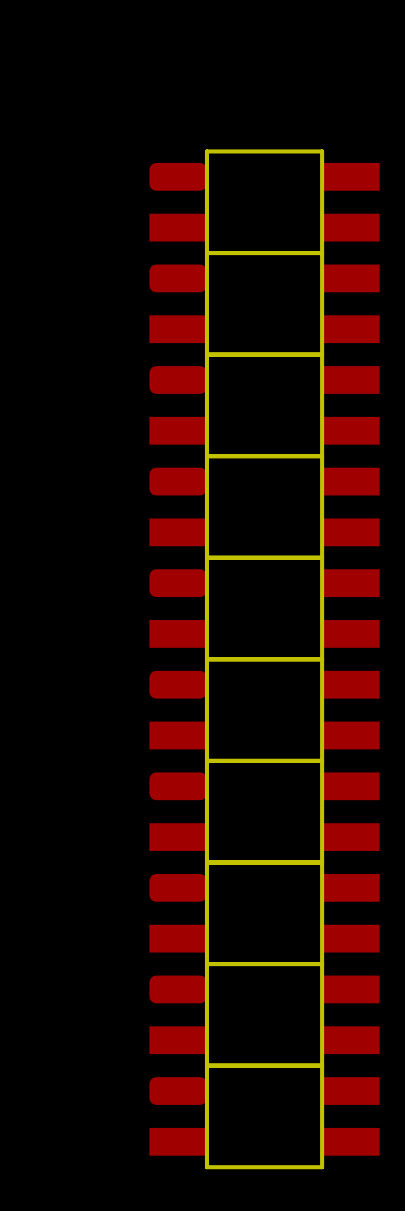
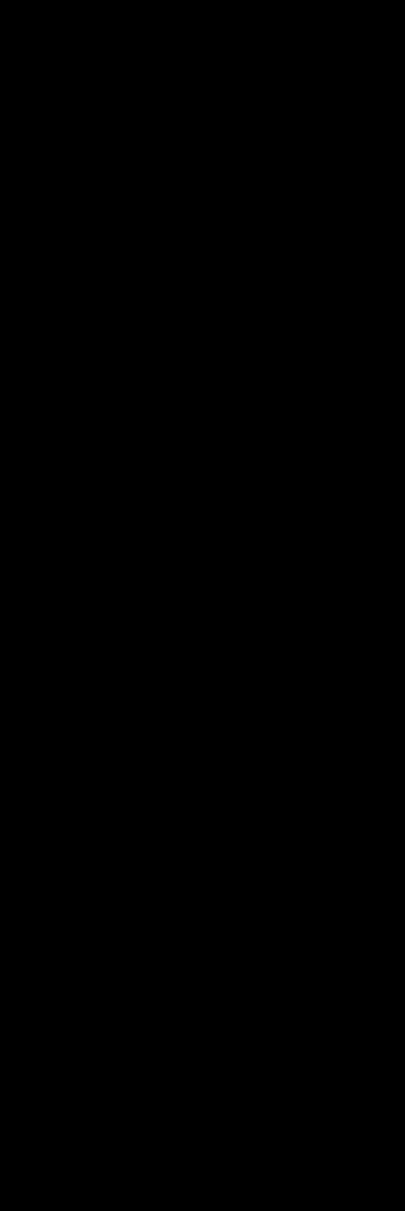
part: (264, 202) -> none
part: (264, 303) -> none
part: (264, 405) -> none
part: (264, 506) -> none
part: (264, 608) -> none
part: (264, 710) -> none
part: (264, 811) -> none
part: (264, 913) -> none
part: (264, 1014) -> none
part: (264, 1116) -> none

